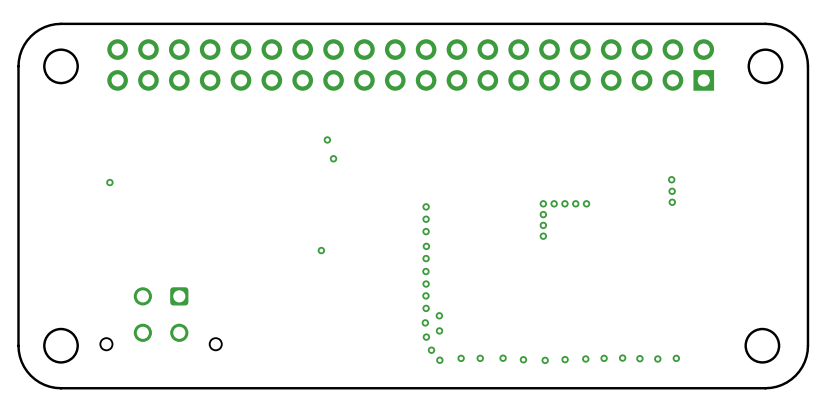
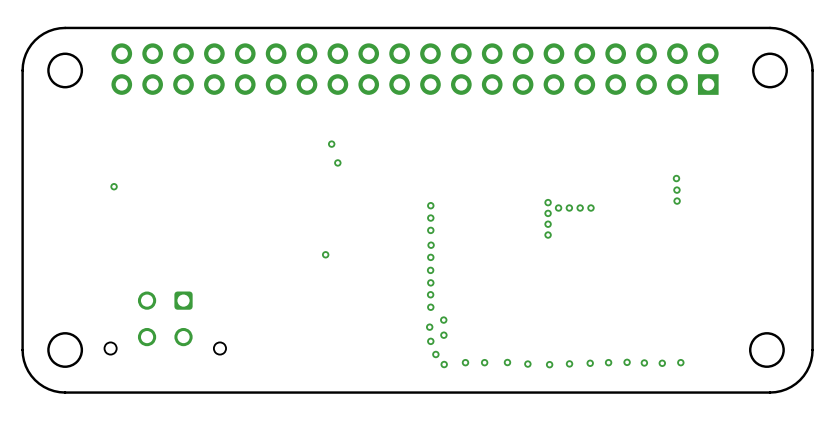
via: none -> (676, 178)
via: (671, 179) -> none
via: none -> (676, 190)
via: (672, 191) -> none
via: none -> (677, 201)
via: none -> (548, 202)
via: none -> (430, 205)
via: (672, 202) -> none
via: (543, 203) -> none
via: (426, 206) -> none
via: none -> (548, 213)
via: none -> (430, 218)
via: (543, 214) -> none
via: (426, 219) -> none
via: none -> (548, 224)
via: (543, 225) -> none
via: none -> (430, 230)
via: none -> (548, 235)
via: (426, 231) -> none
via: (543, 236) -> none
via: none -> (431, 245)
via: (426, 246) -> none
via: none -> (430, 257)
via: (426, 258) -> none
via: none -> (430, 270)
via: (425, 271) -> none
via: none -> (430, 282)
via: (426, 284) -> none
via: none -> (430, 294)
via: (425, 295) -> none
via: none -> (430, 307)
via: (426, 308) -> none

